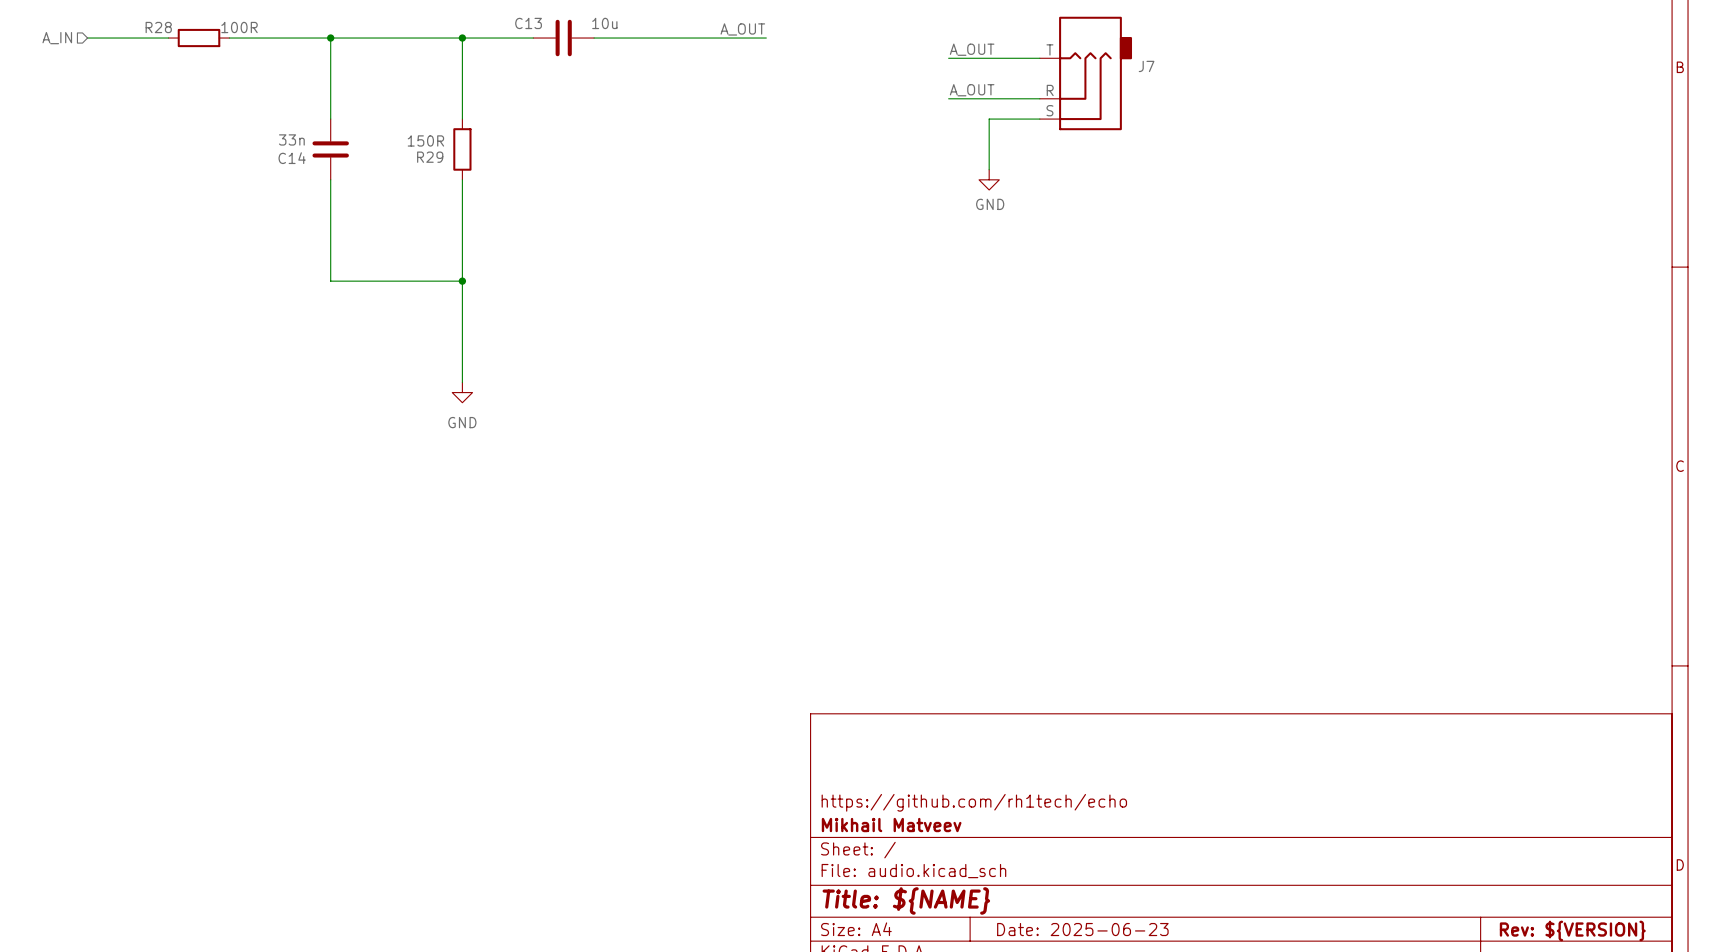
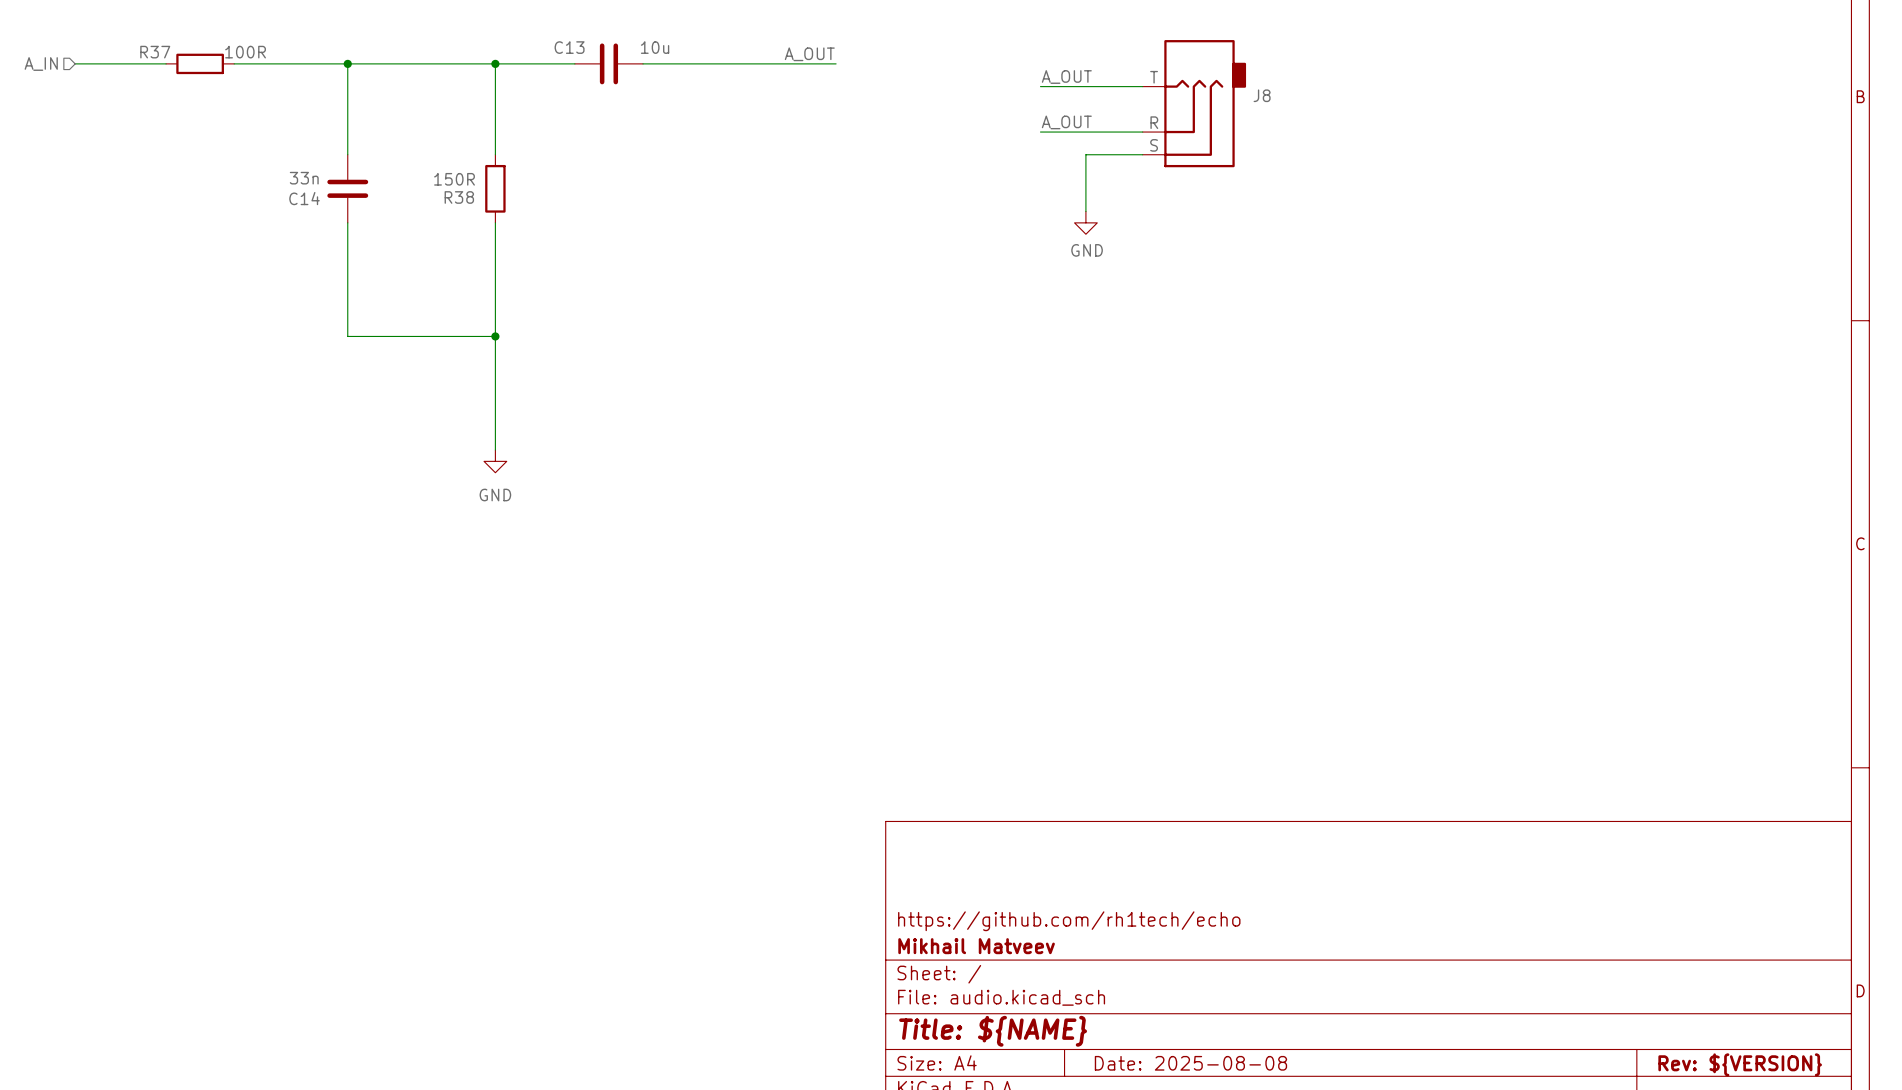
R28 name: R28 (158, 27) -> R37 (155, 52)
J7 name: J7 (1146, 66) -> J8 (1262, 95)
R29 name: R29 (430, 157) -> R38 (459, 197)
title block: Date: 2025-06-23 (1082, 929) -> Date: 2025-08-08 (1190, 1063)

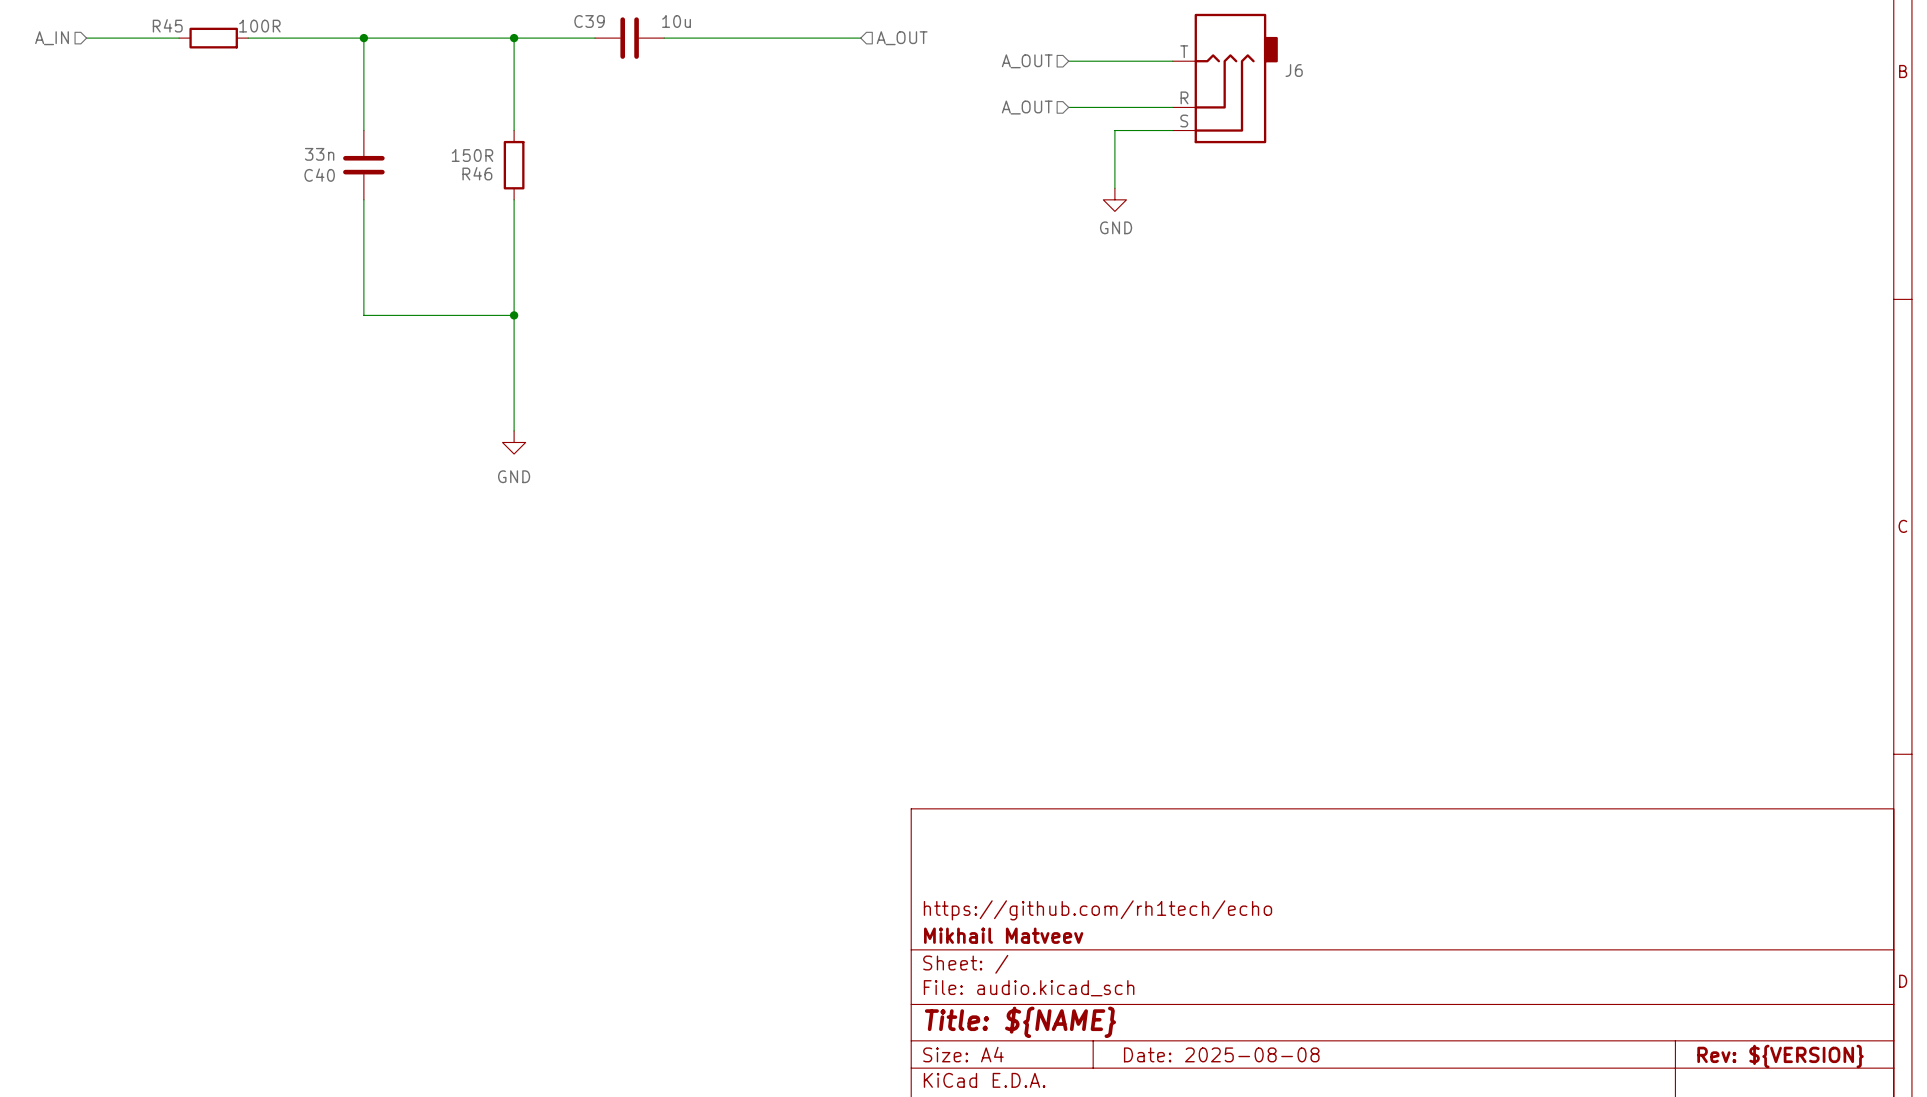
C13 name: C13 (569, 47) -> C39 (589, 21)
R37 name: R37 (155, 52) -> R45 (167, 25)
label: A_OUT (809, 54) -> none
hierarchical label: none -> A_OUT (902, 38)
label: A_OUT (1066, 77) -> none
hierarchical label: none -> A_OUT (1027, 61)
J8 name: J8 (1262, 95) -> J6 (1294, 70)
label: A_OUT (1066, 122) -> none
hierarchical label: none -> A_OUT (1027, 107)
R38 name: R38 (459, 197) -> R46 (477, 173)
C14 name: C14 (304, 198) -> C40 (319, 175)

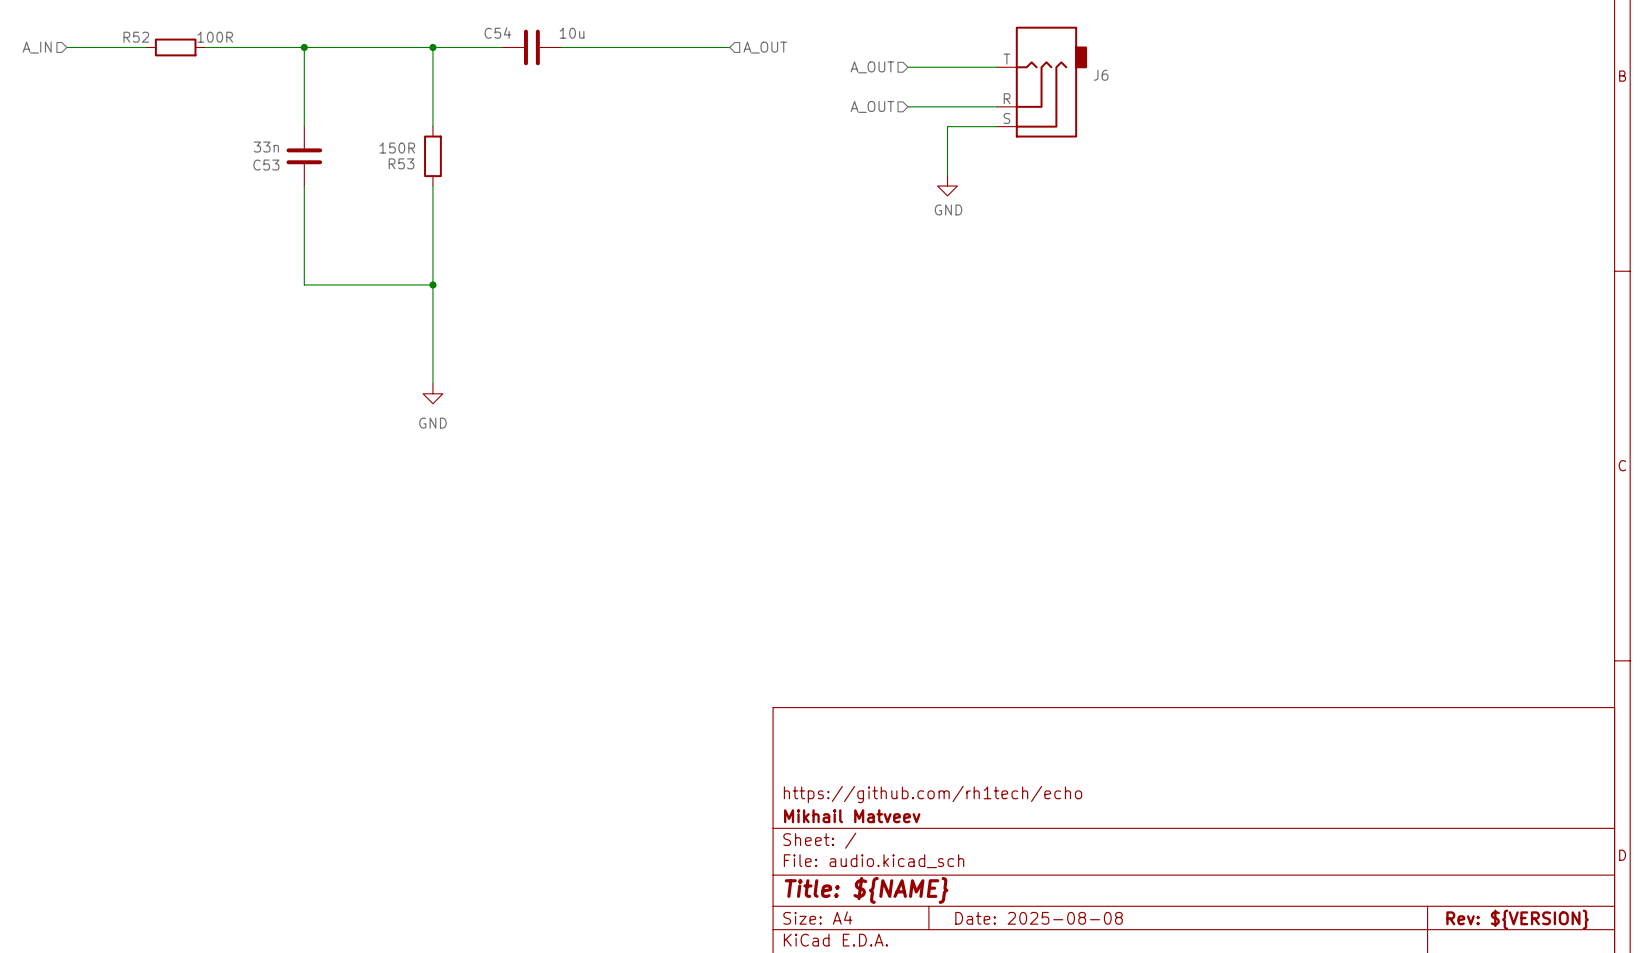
C39 name: C39 (589, 21) -> C54 (497, 33)
R45 name: R45 (167, 25) -> R52 (136, 37)
R46 name: R46 (477, 173) -> R53 (401, 163)
C40 name: C40 (319, 175) -> C53 (266, 165)

